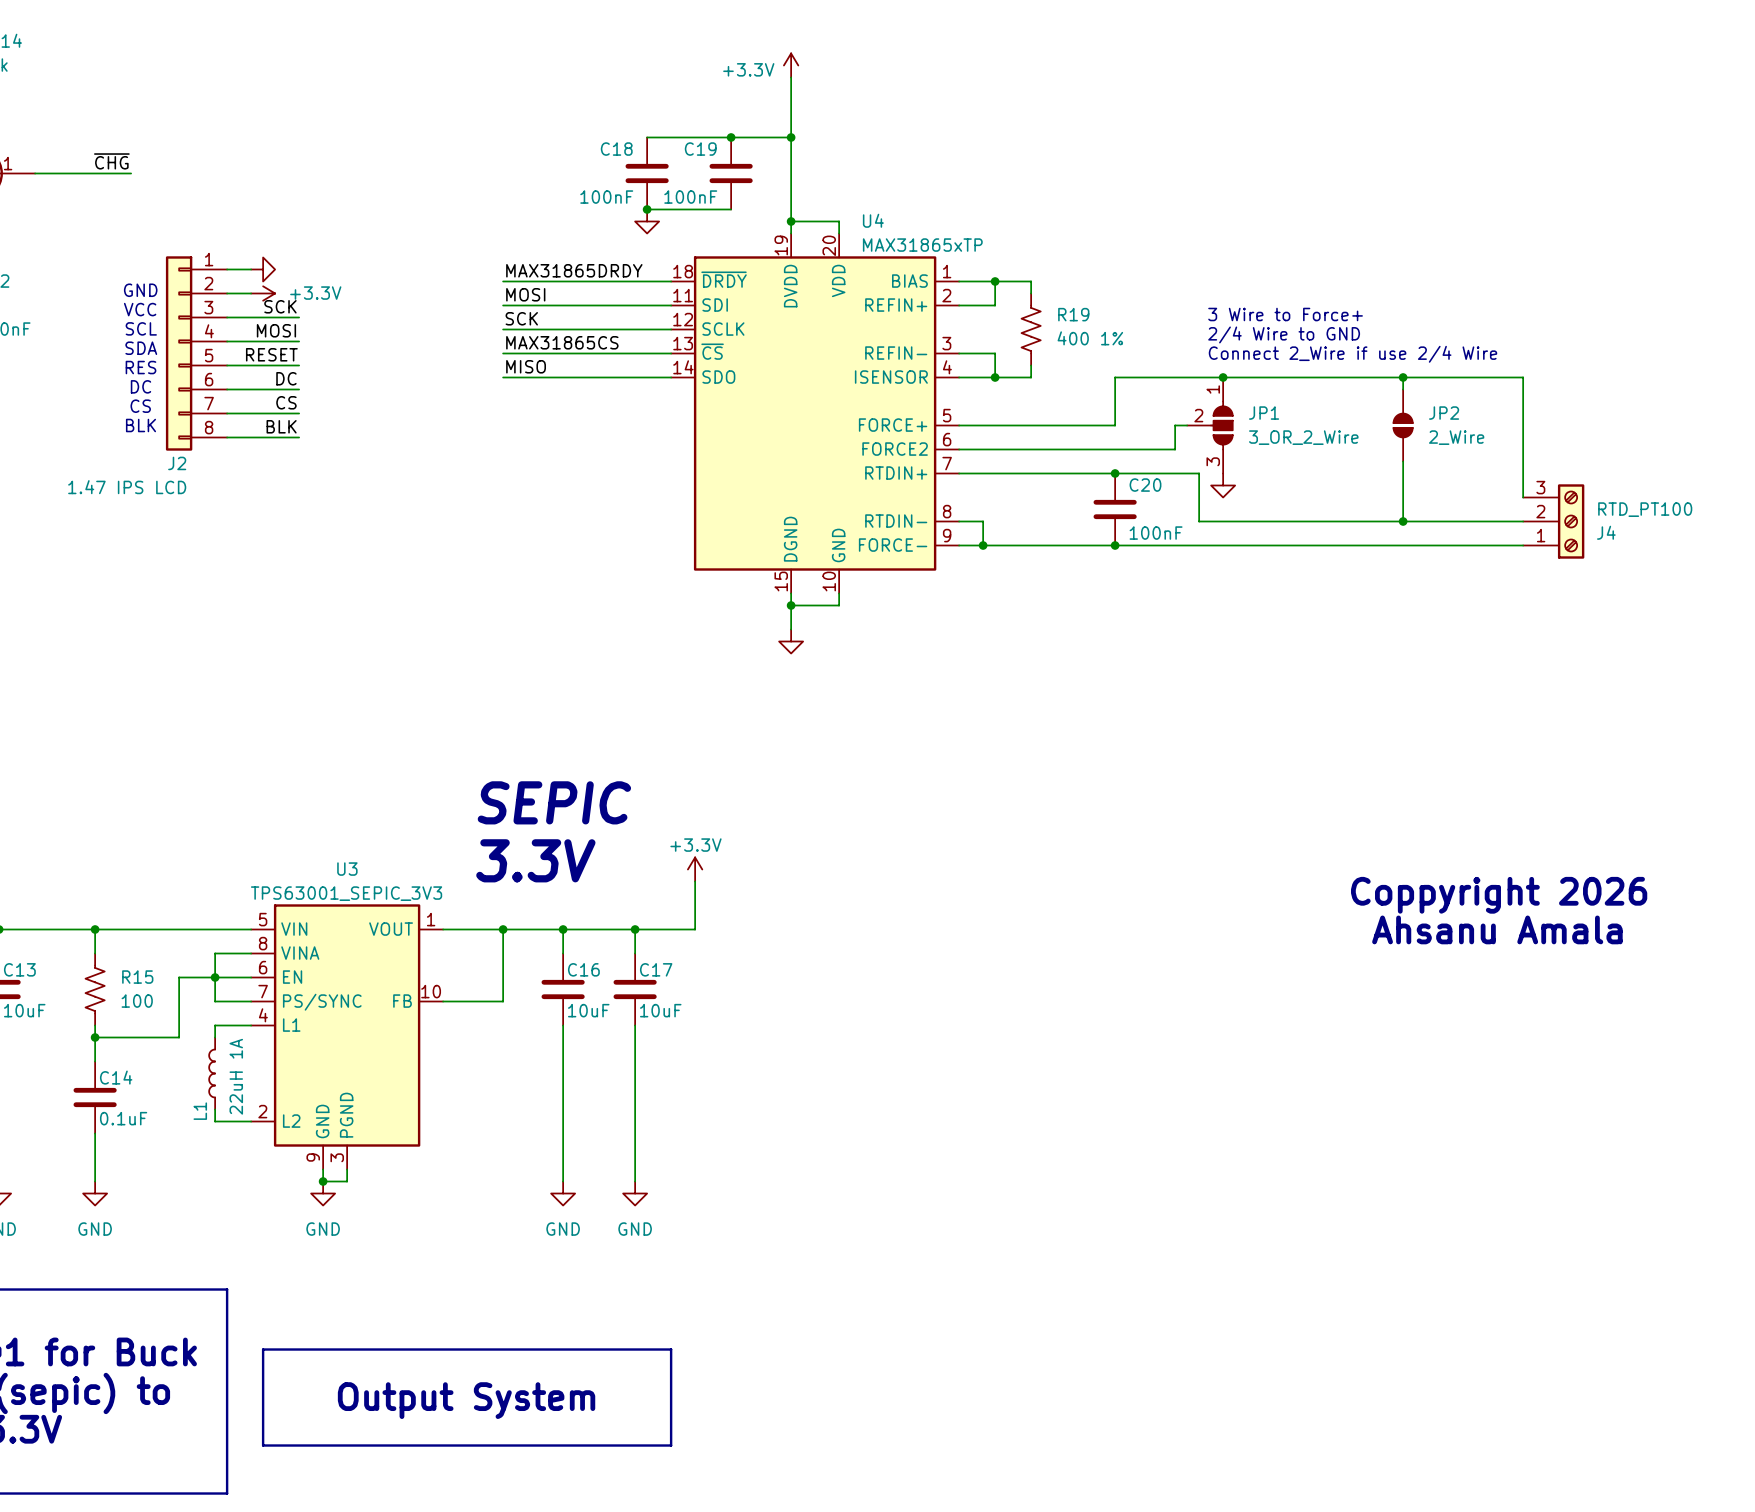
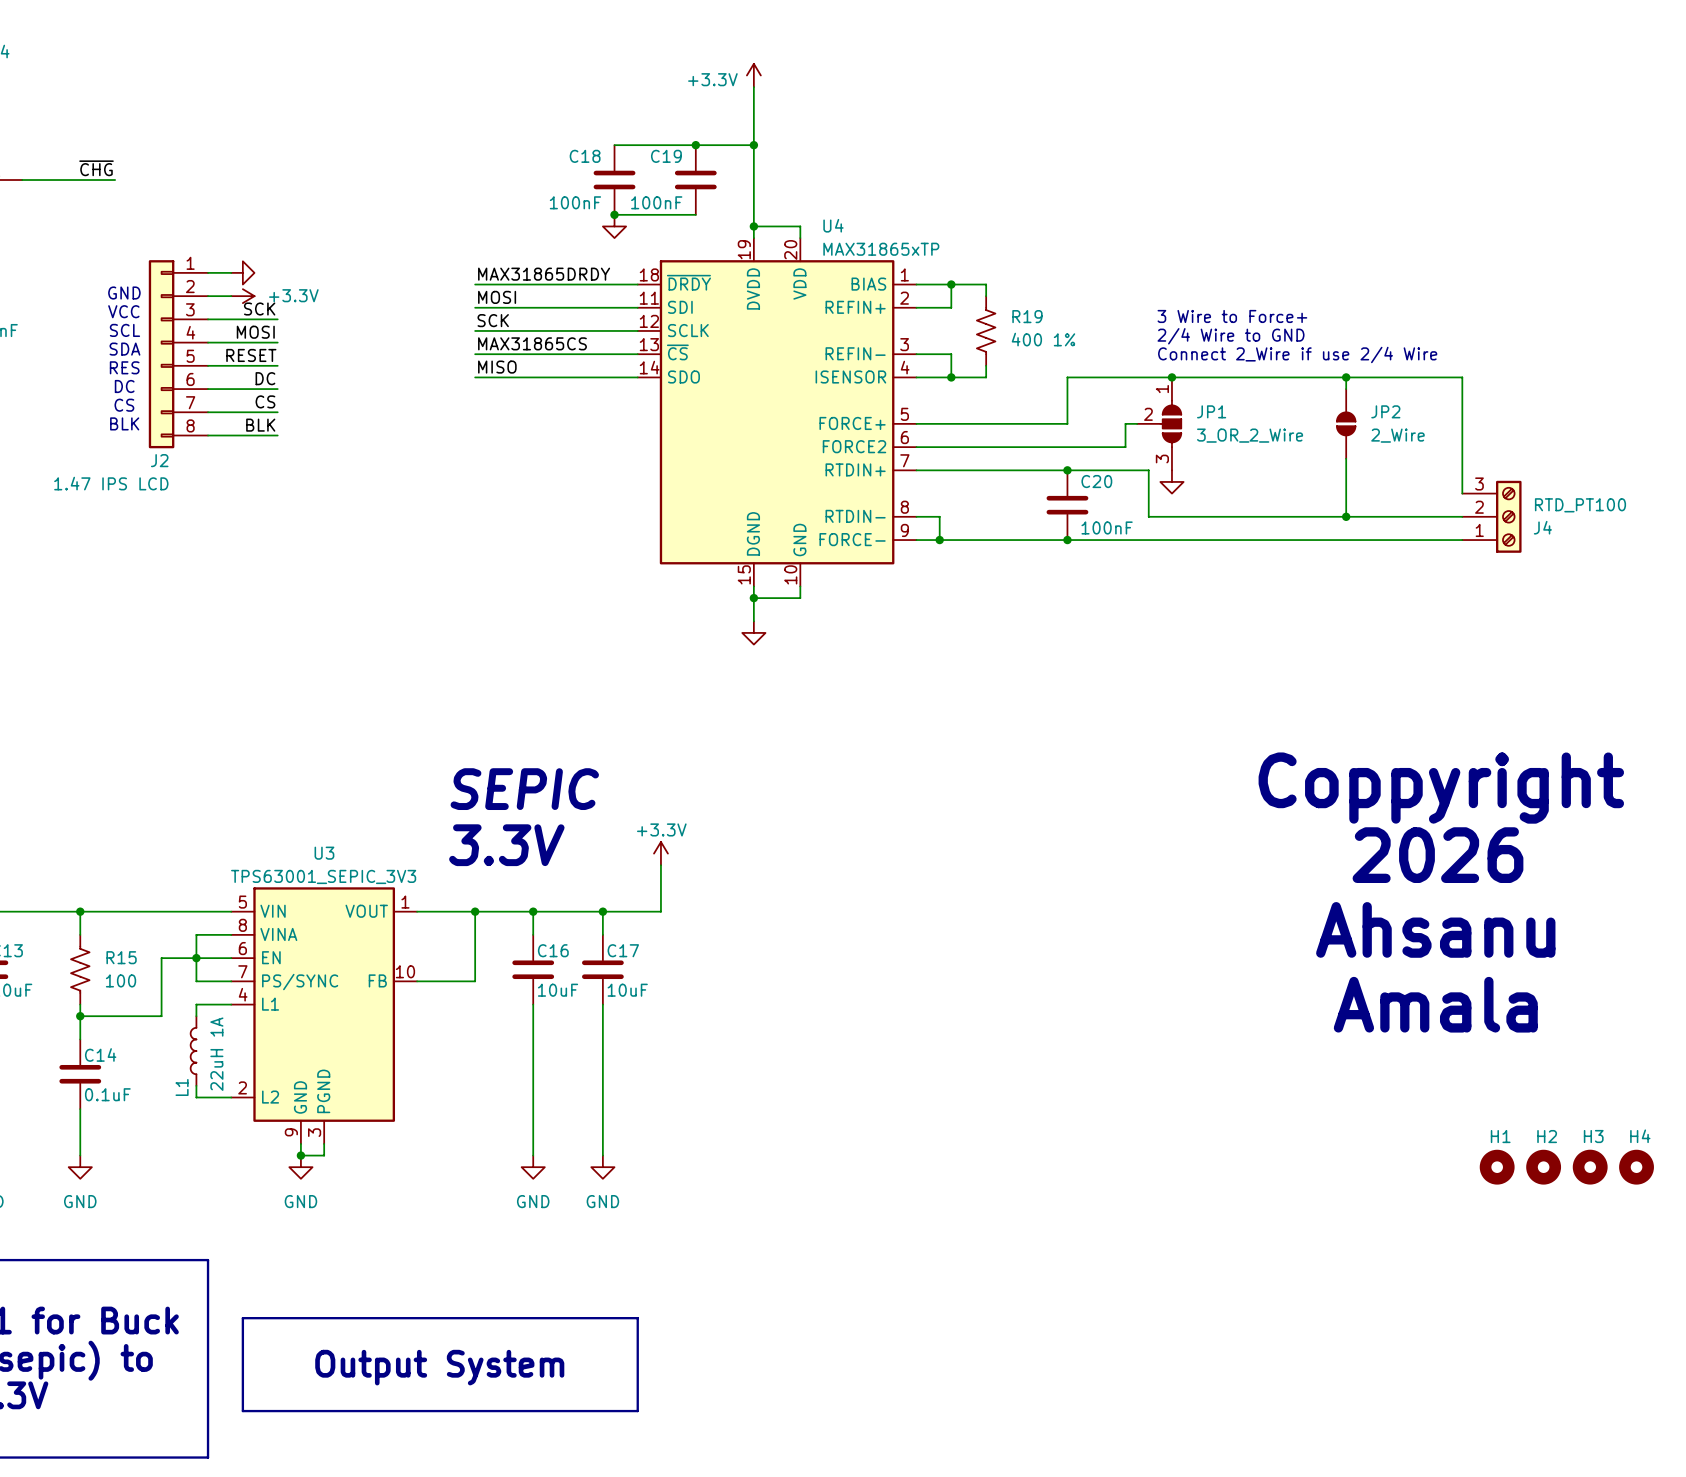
text: none -> Coppyright (1441, 788)
text: none -> 2026 (1437, 855)
text: Coppyright 2026 (1499, 895) -> none
text: Ahsanu Amala (1497, 929) -> Ahsanu (1435, 929)
text: none -> Amala (1435, 1004)
H1: none -> (1497, 1167)
H2: none -> (1543, 1167)
H3: none -> (1590, 1167)
H4: none -> (1636, 1167)

